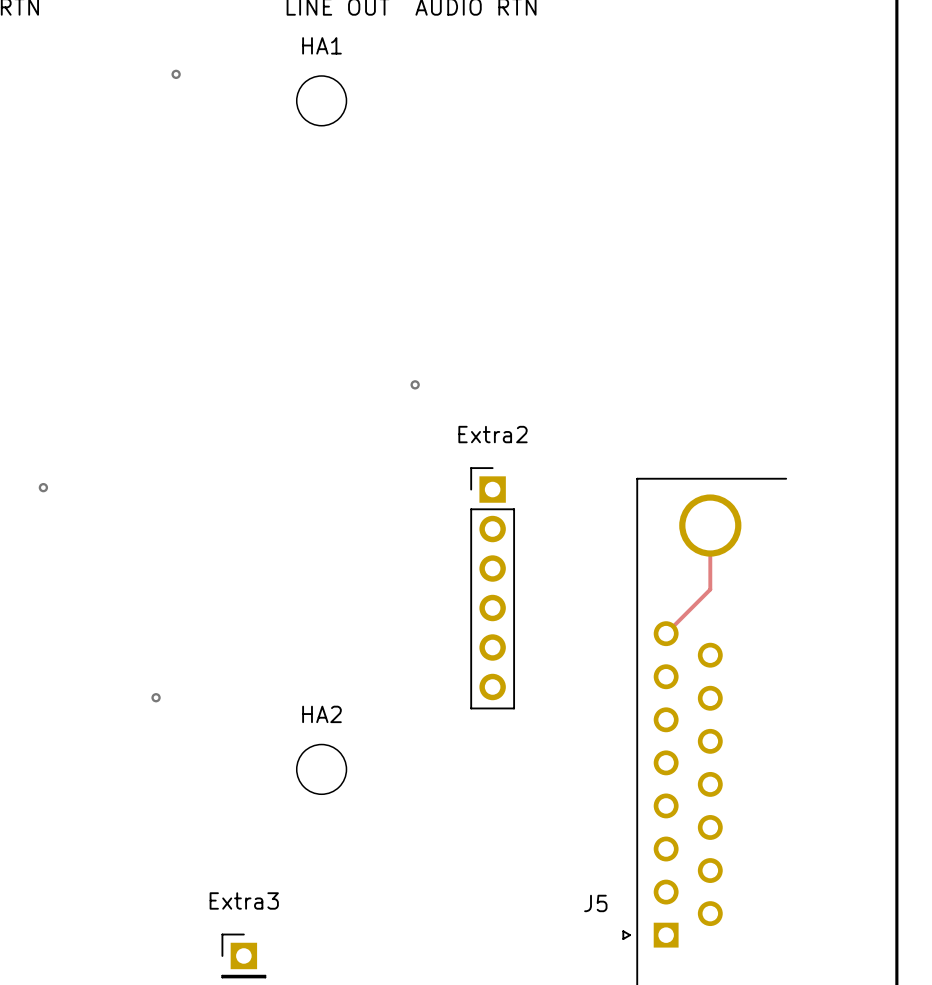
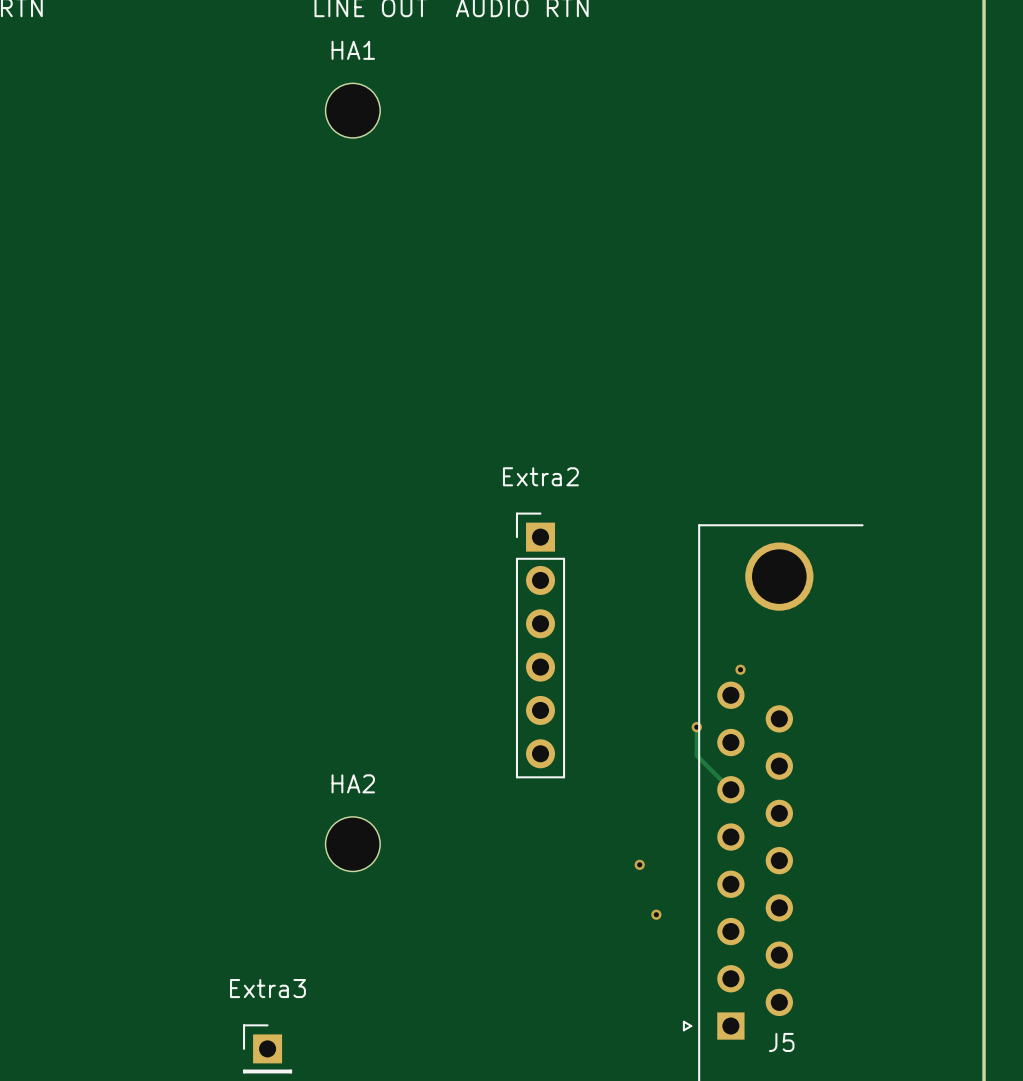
via: (176, 74) -> none
via: (415, 384) -> none
via: (43, 487) -> none
track: (710, 525) (710, 589) (666, 633) -> none
via: none -> (740, 669)
track: none -> (696, 727) (696, 755) (730, 789)
via: none -> (696, 727)
via: (156, 697) -> none
via: none -> (639, 864)
via: none -> (656, 914)
J5 name position: J5 (595, 903) -> J5 (781, 1042)

